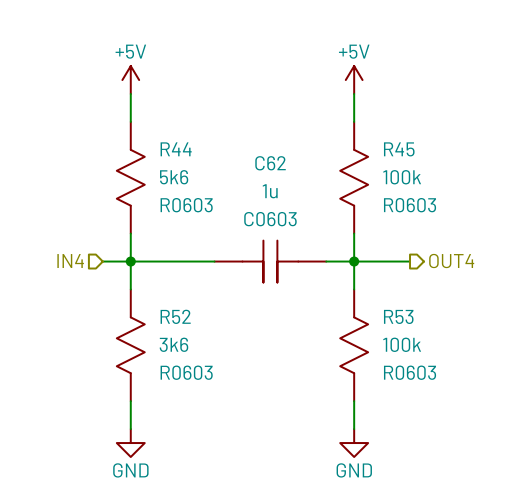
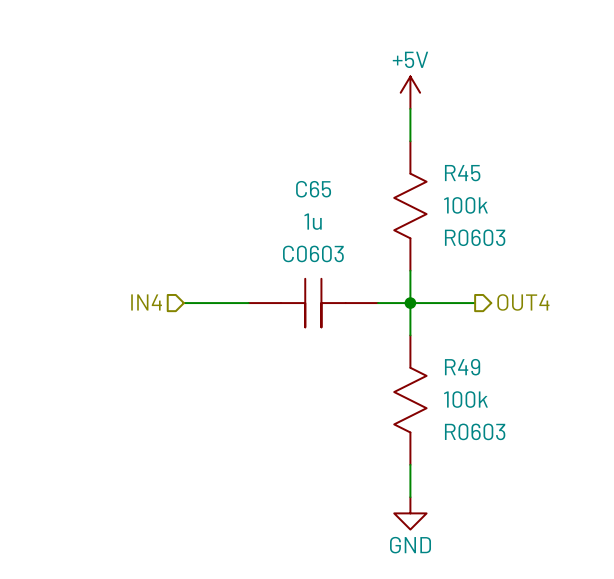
power symbol: +5V (130, 80) -> none
wire: (130, 94) (130, 121) -> none
C62 name: C62 (270, 163) -> C65 (313, 189)
R44: (130, 177) -> none
wire: (130, 233) (130, 289) -> none
hierarchical label position: IN4 (70, 261) -> IN4 (146, 302)
wire: (102, 261) (158, 261) -> none
junction: (130, 261) -> none
R53 name: R53 (398, 316) -> R49 (462, 367)
R52: (130, 345) -> none
wire: (130, 401) (130, 429) -> none
power symbol: GND (130, 443) -> none

